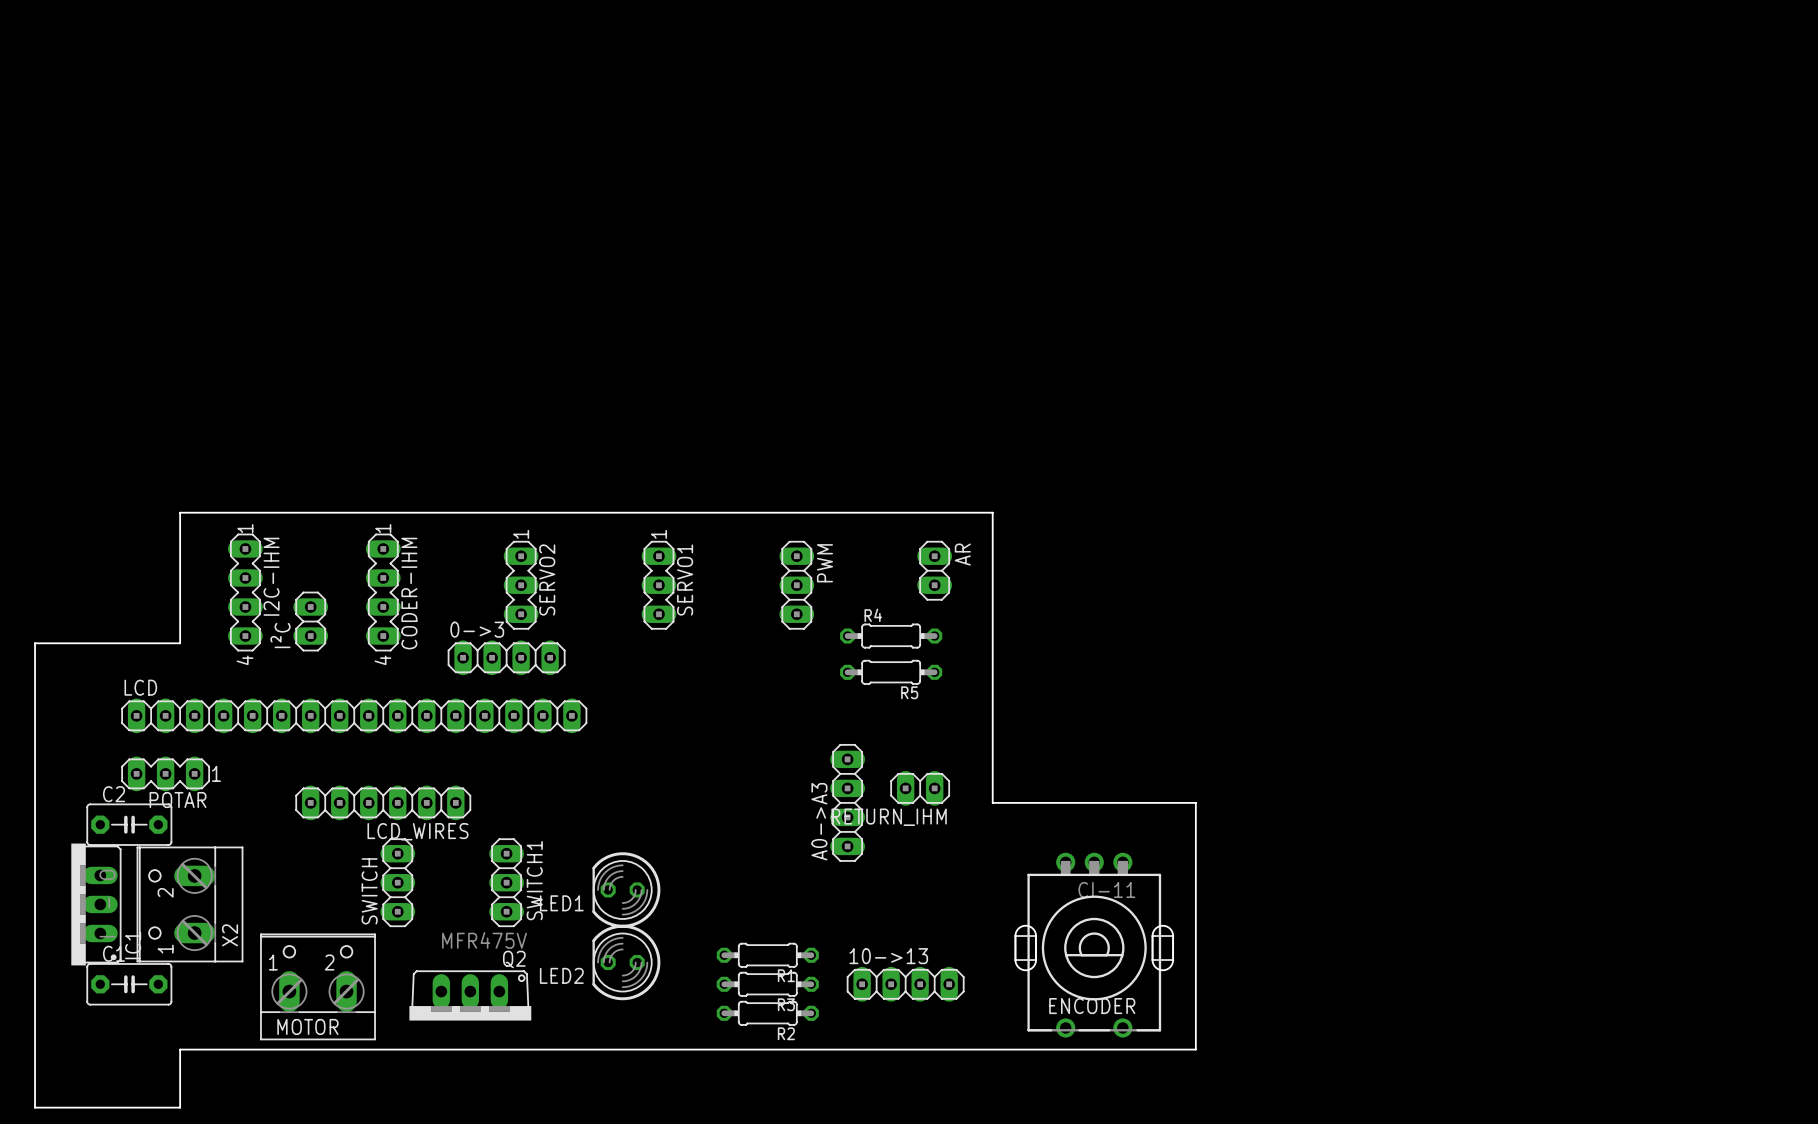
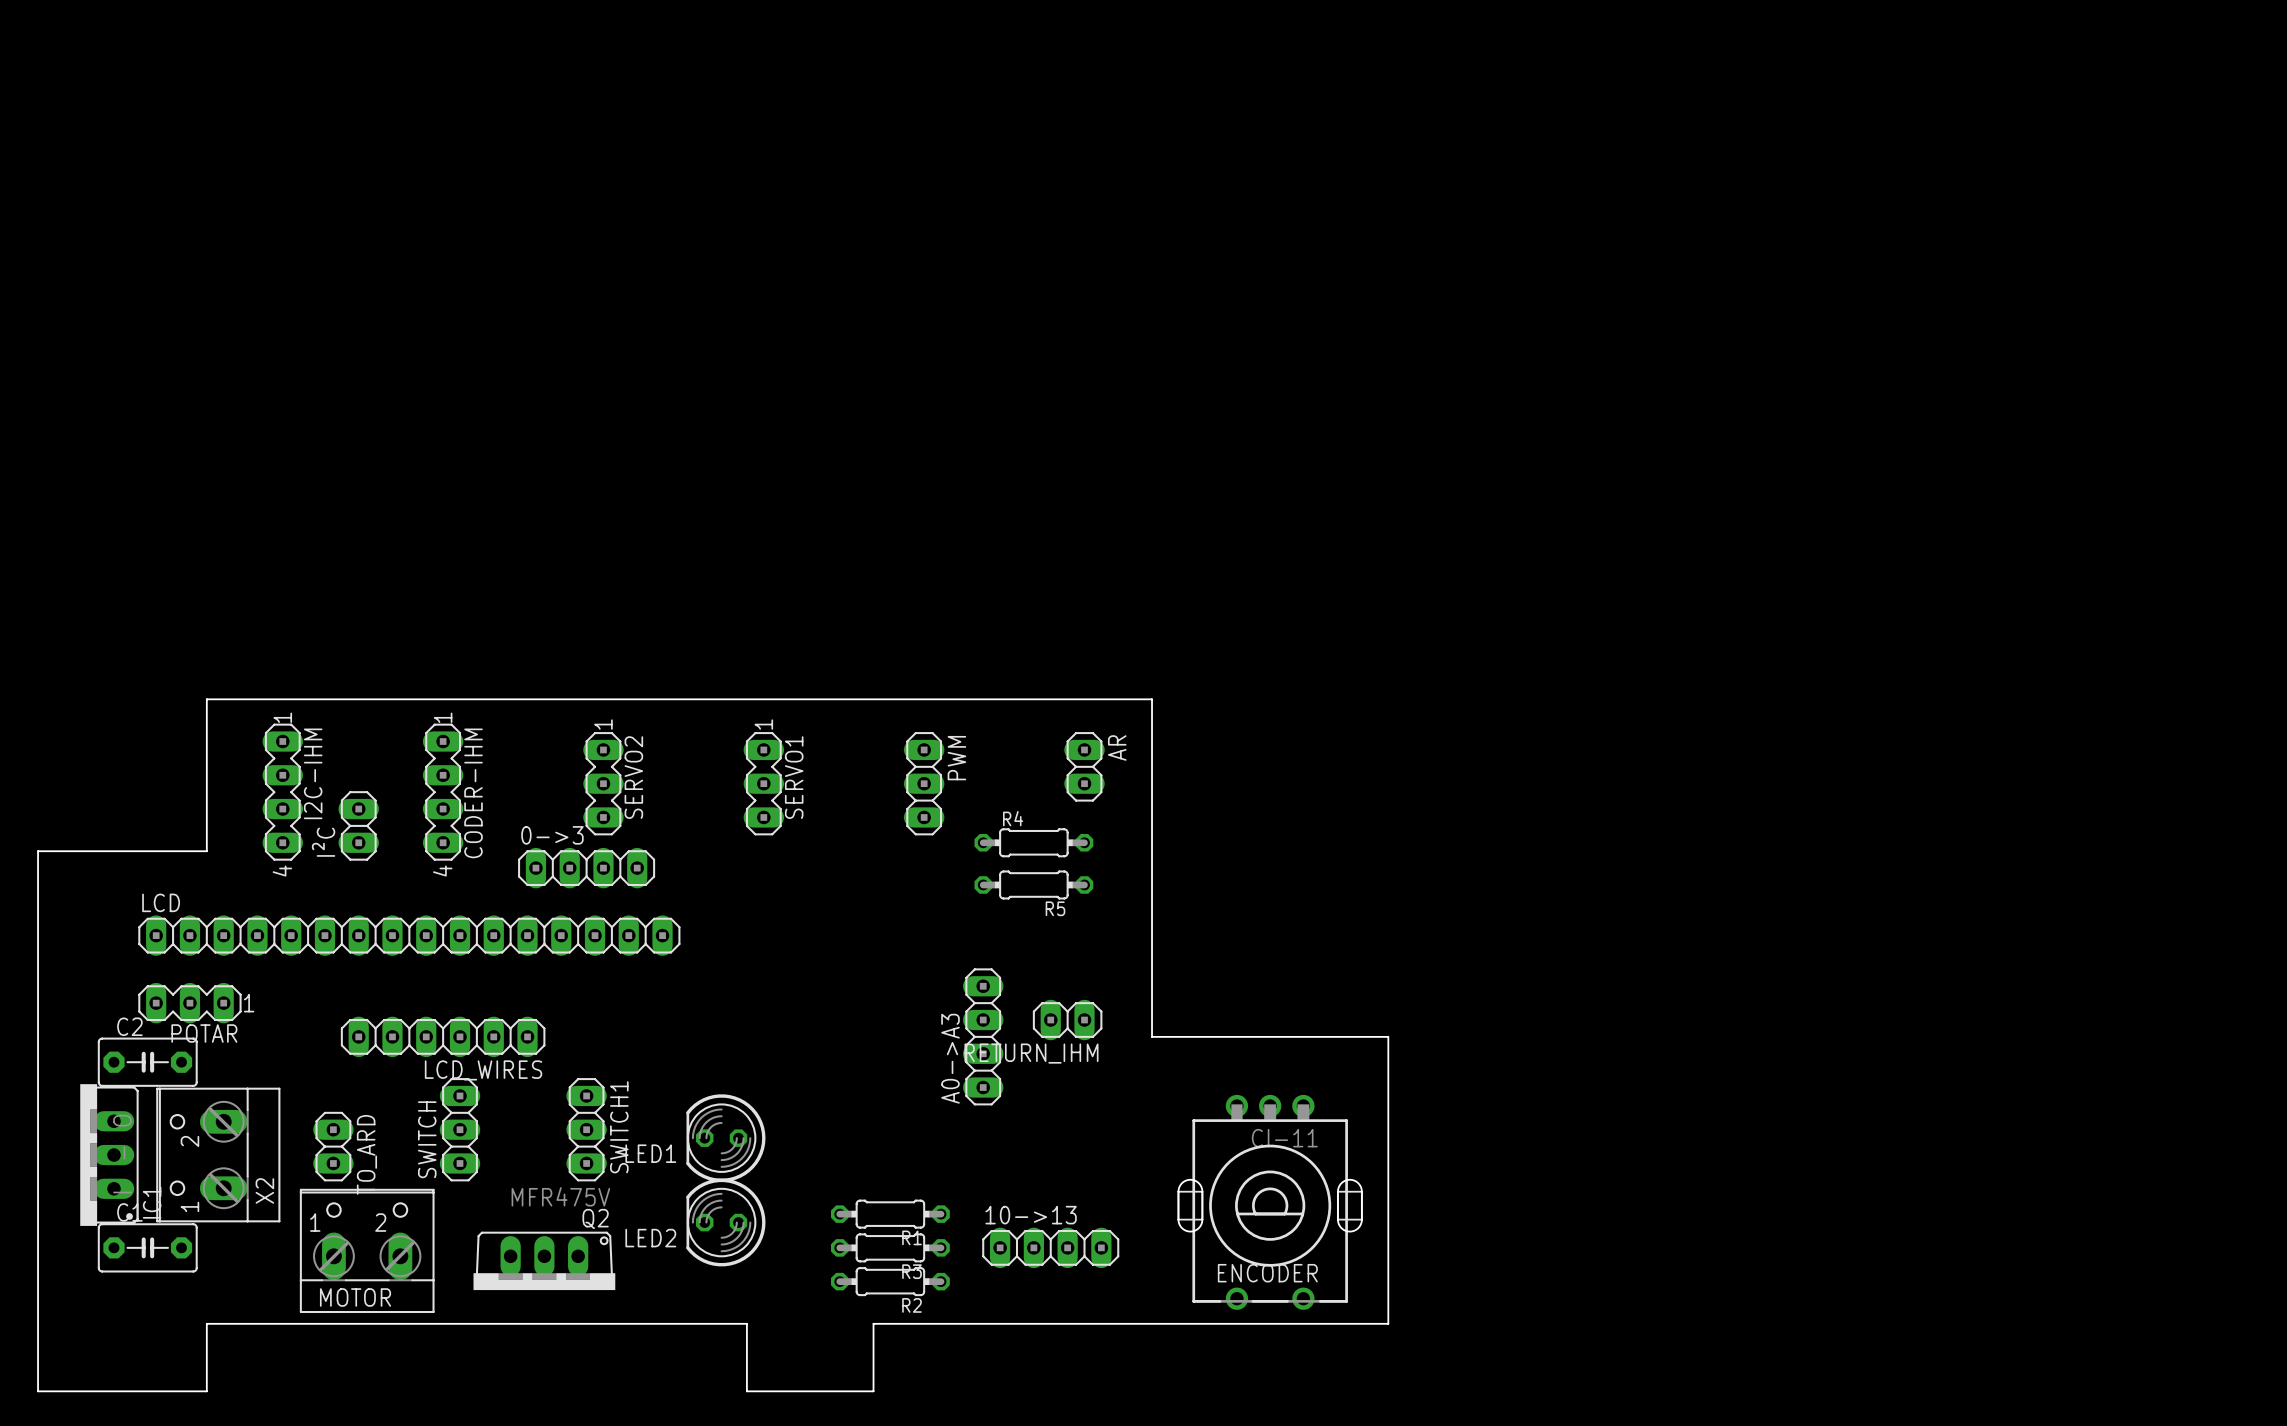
TO_ARD: none -> (333, 1146)
board edge: (644, 1049) (753, 1049) -> (746, 1323) (746, 1391) (873, 1391) (873, 1323)

